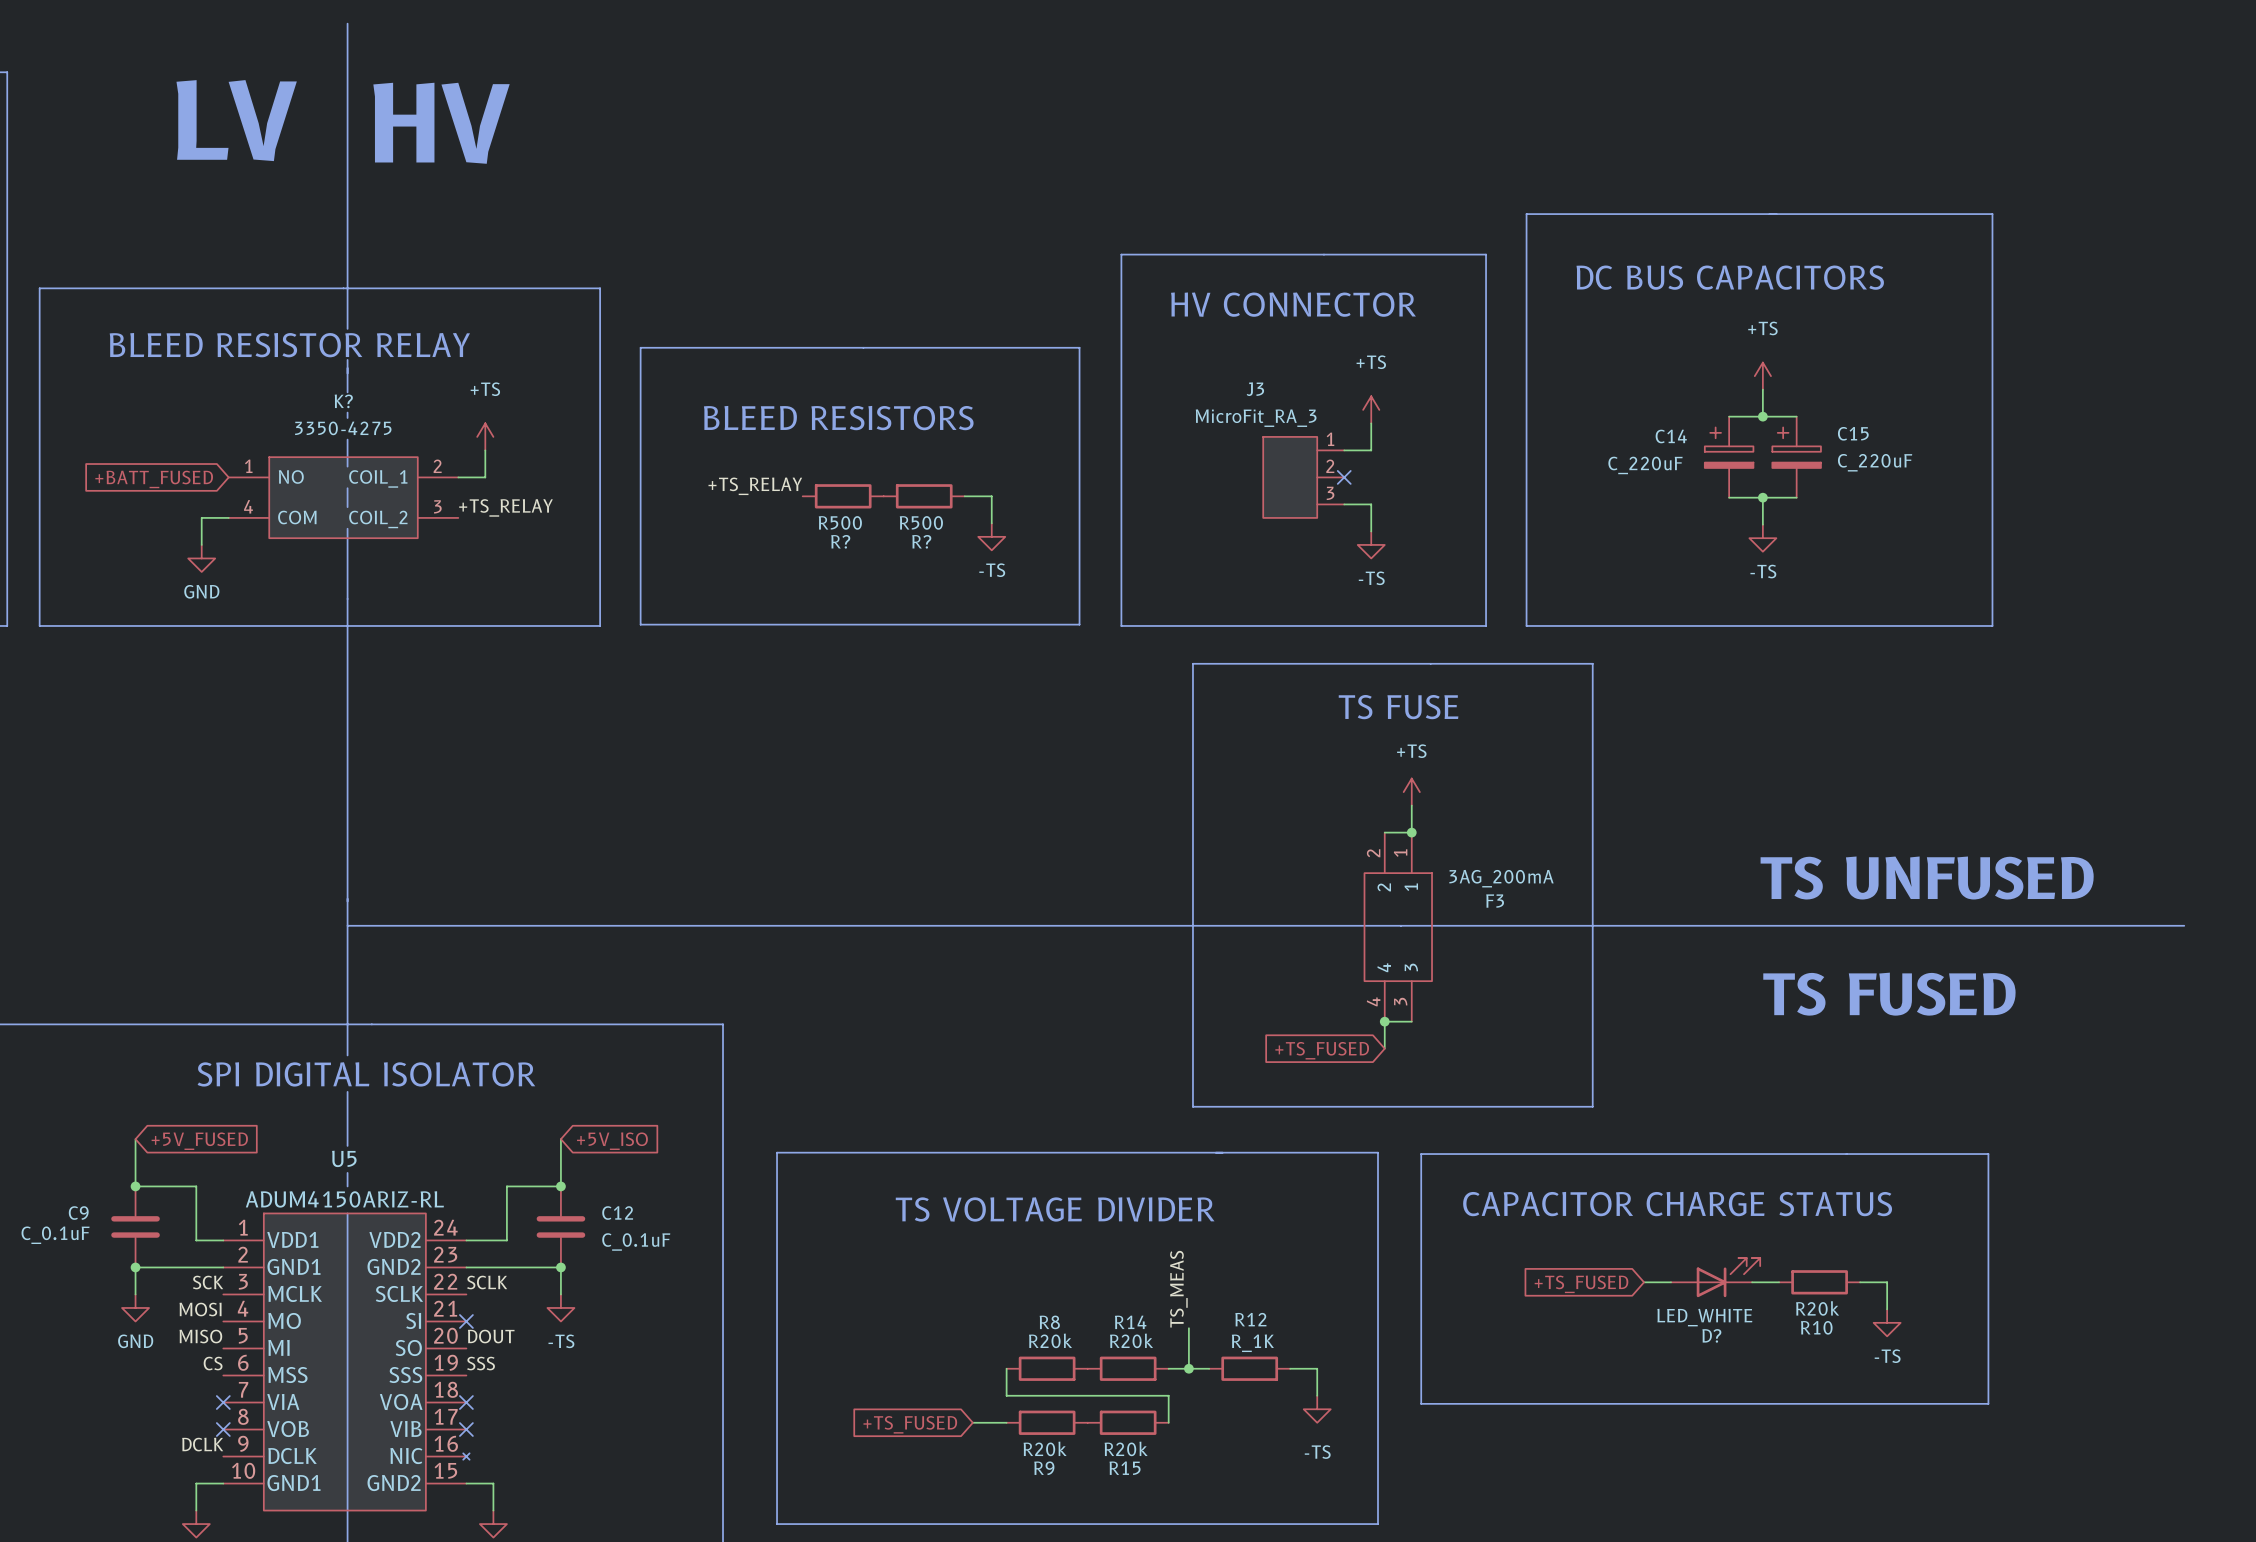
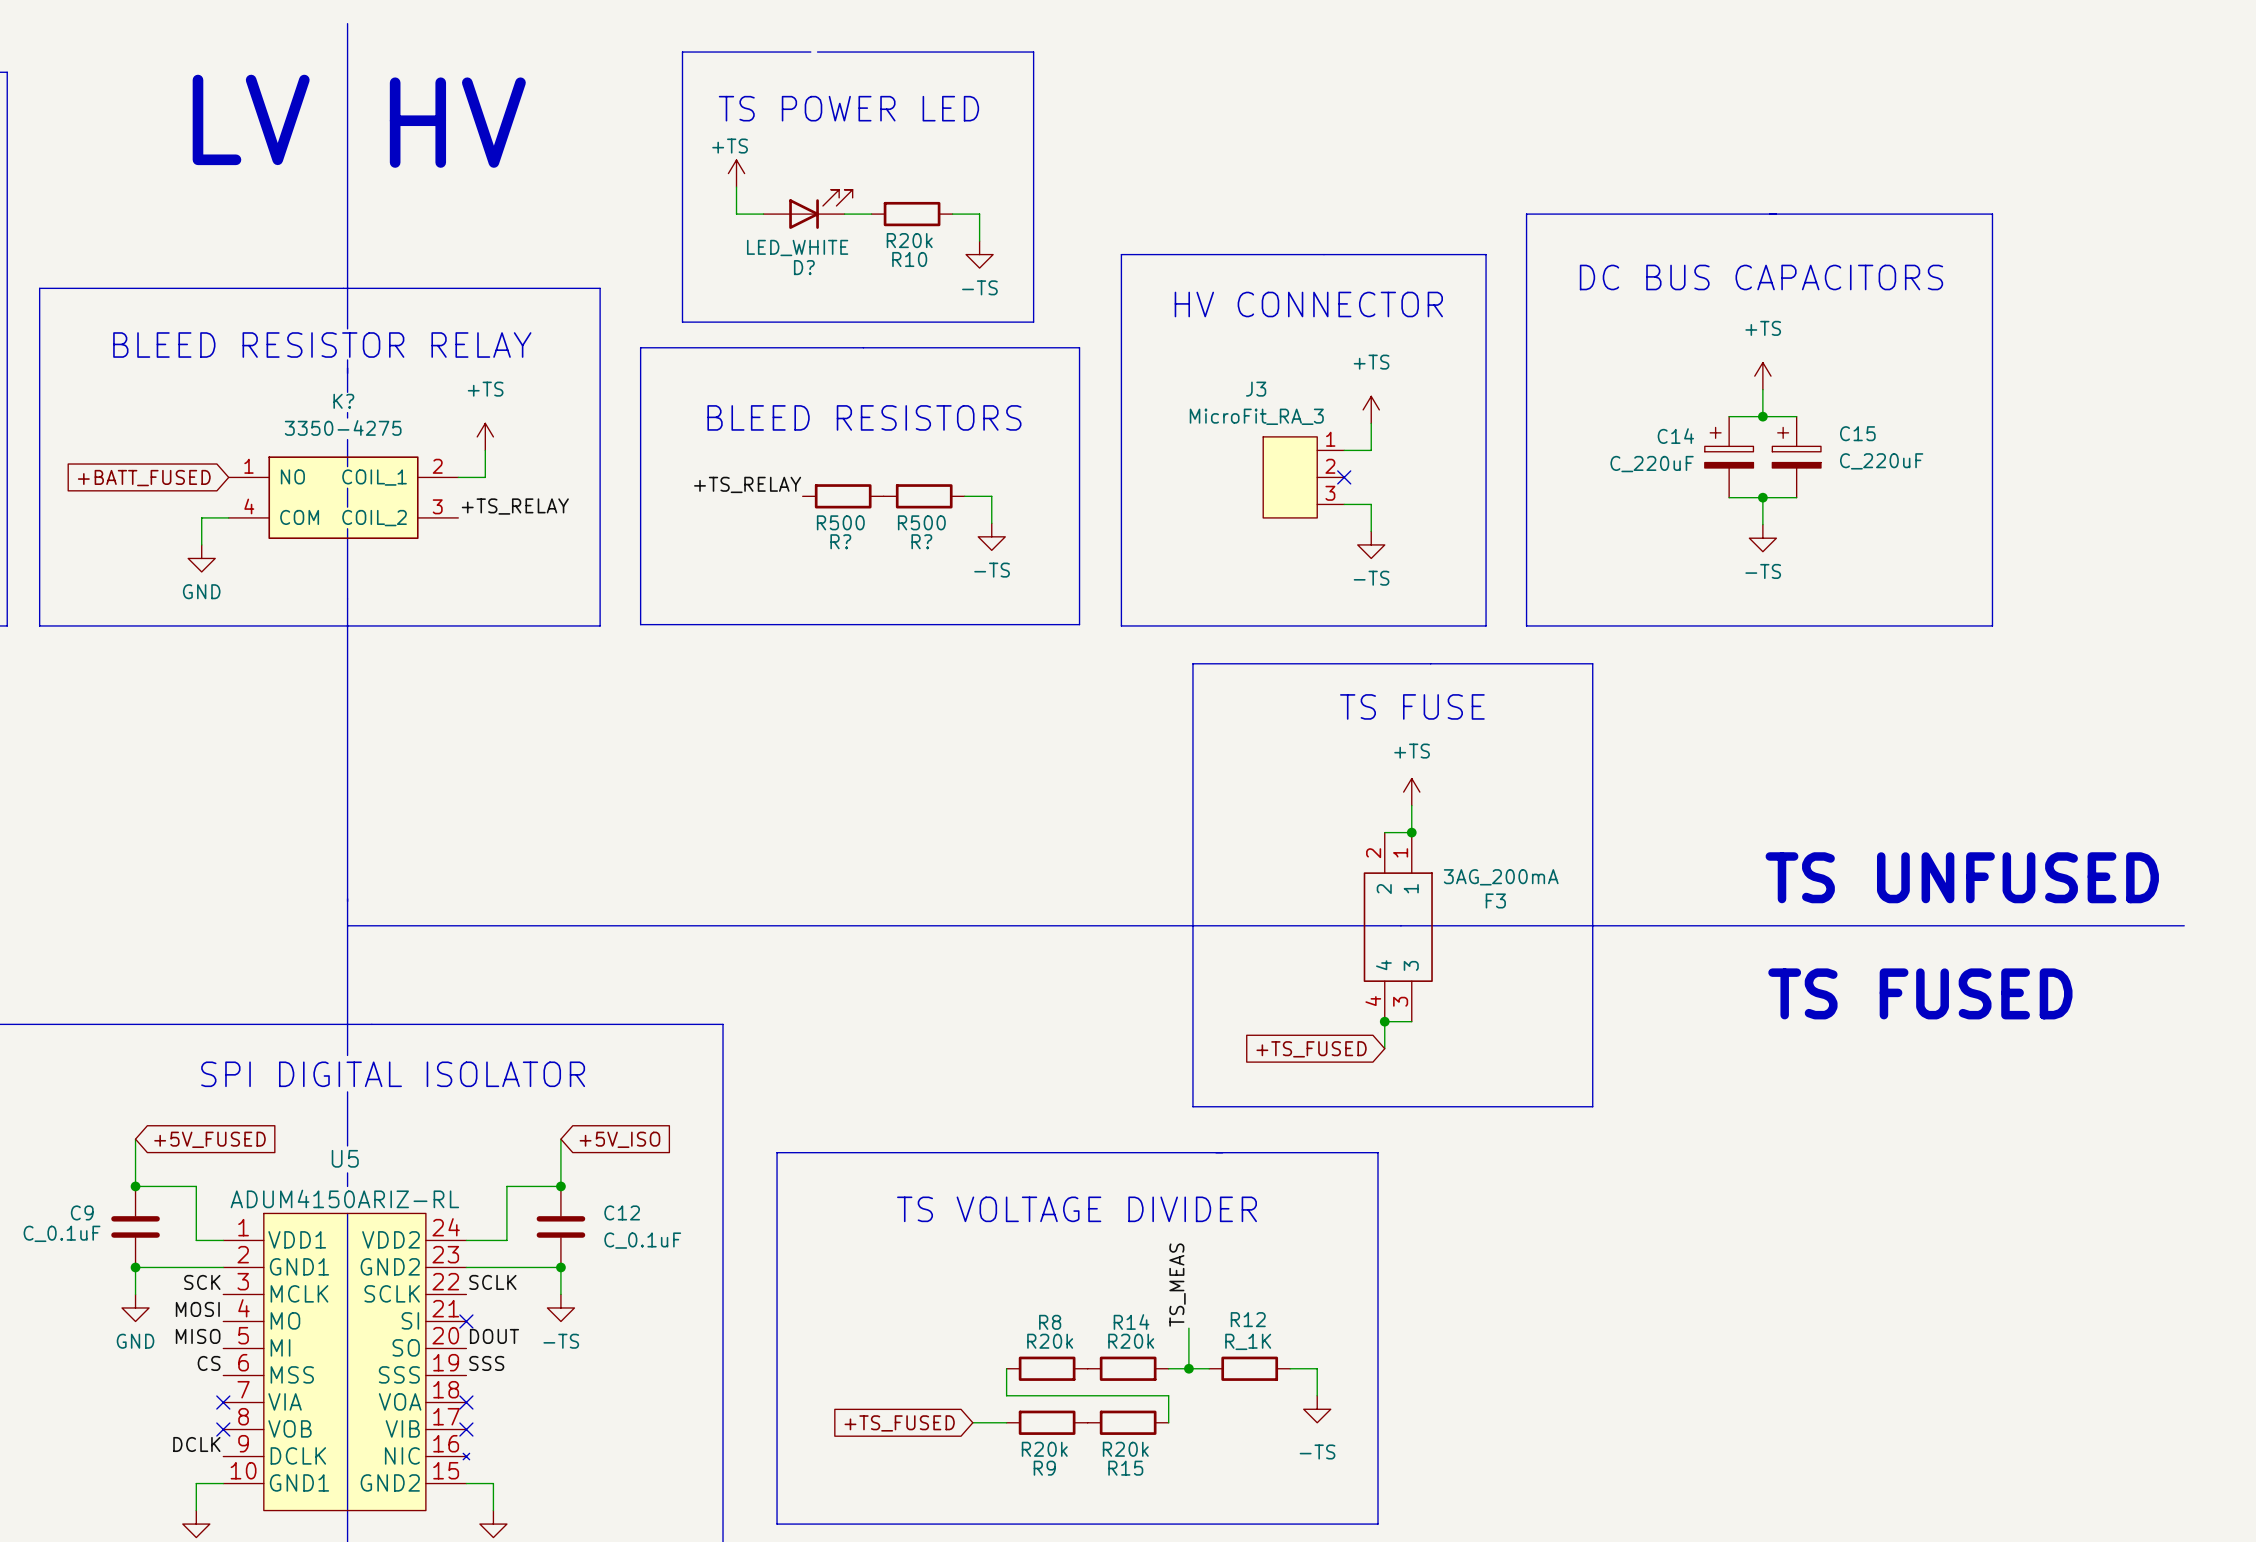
line: none -> (810, 52) (682, 52) (682, 322) (1033, 322) (1033, 52) (817, 52)
text: none -> TS POWER LED (848, 108)
power symbol: none -> +TS (736, 173)
wire: none -> (736, 187) (736, 214) (763, 214)
D?: none -> LED_WHITE (808, 209)
wire: none -> (844, 214) (871, 214)
wire: none -> (952, 214) (979, 214) (979, 241)
power symbol: none -> -TS (979, 254)
line: (1421, 1154) (1421, 1403) (1988, 1403) (1988, 1154) (1421, 1154) -> none
text: CAPACITOR CHARGE STATUS (1677, 1204) -> none
D?: LED_WHITE (1715, 1277) -> none
wire: (1644, 1282) (1671, 1282) -> none
wire: (1752, 1282) (1779, 1282) -> none
R10 position: (1819, 1282) -> (912, 214)
wire: (1860, 1282) (1887, 1282) (1887, 1309) -> none
global label: +TS_FUSED (1581, 1284) -> none
power symbol: -TS (1887, 1322) -> none

